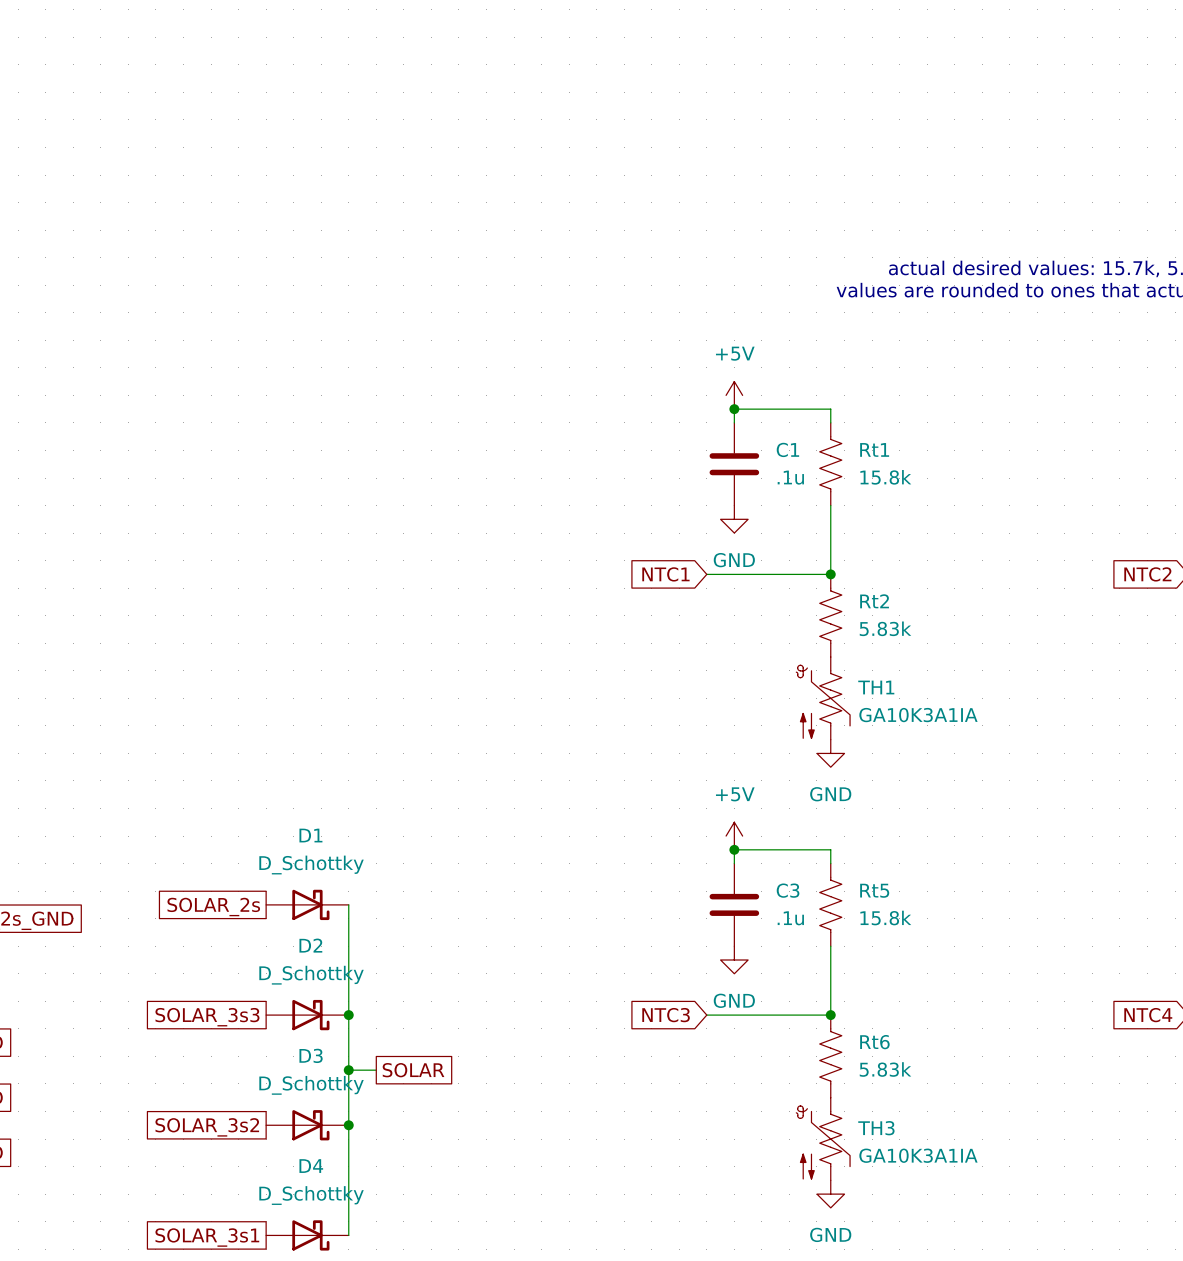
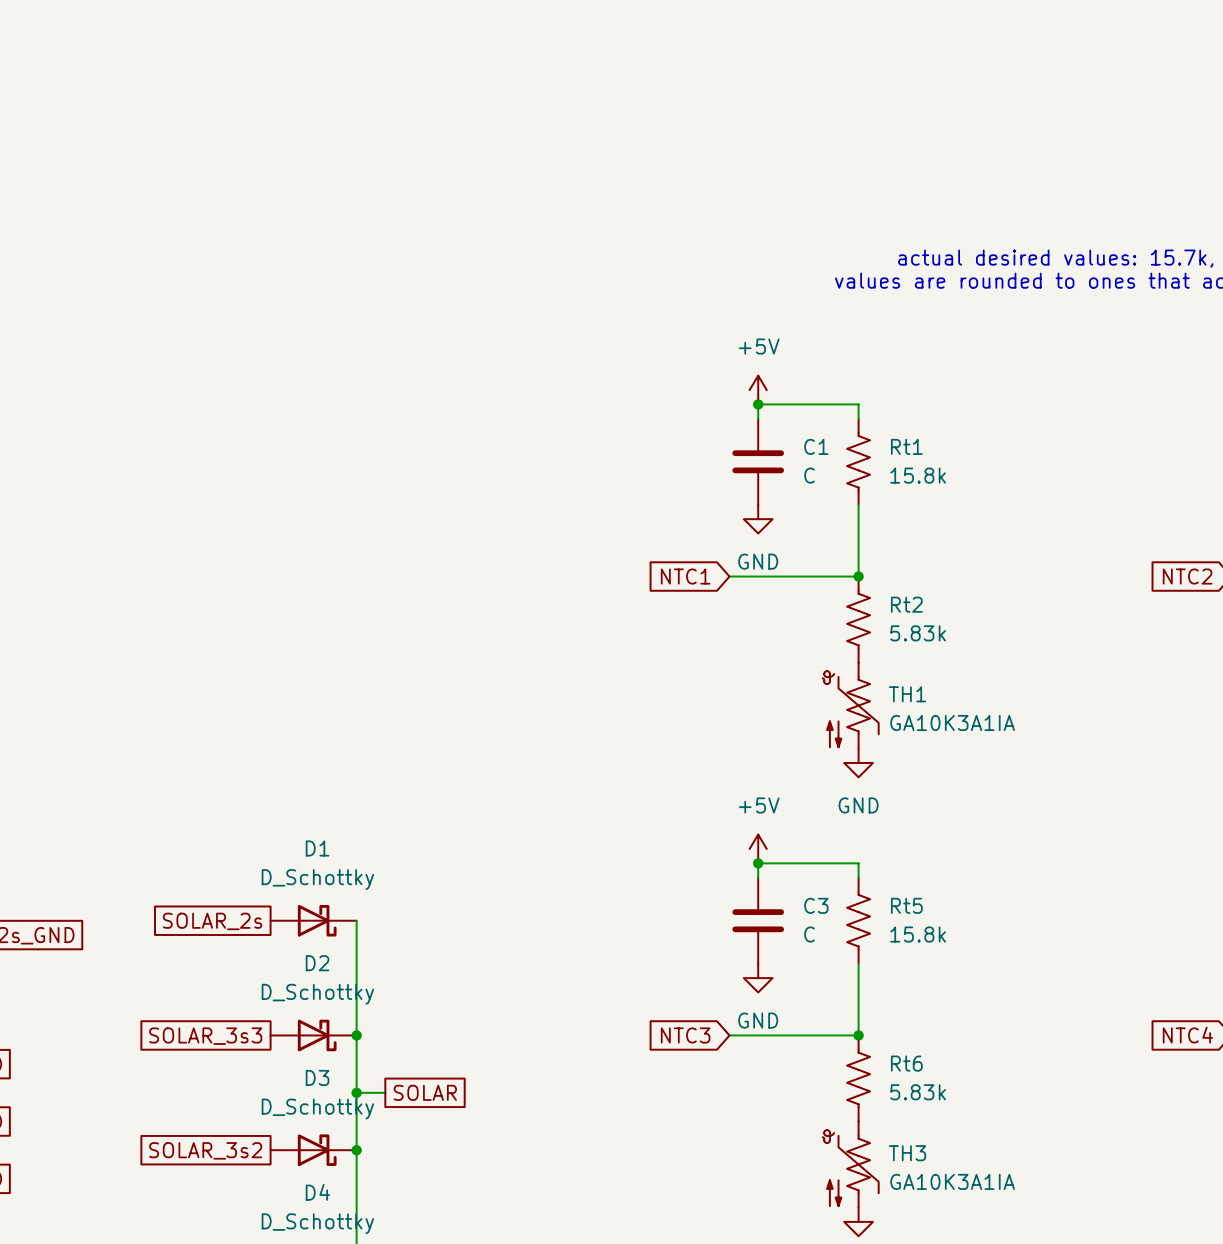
C1 value: .1u (790, 477) -> C (809, 475)
C3 value: .1u (790, 918) -> C (809, 934)

